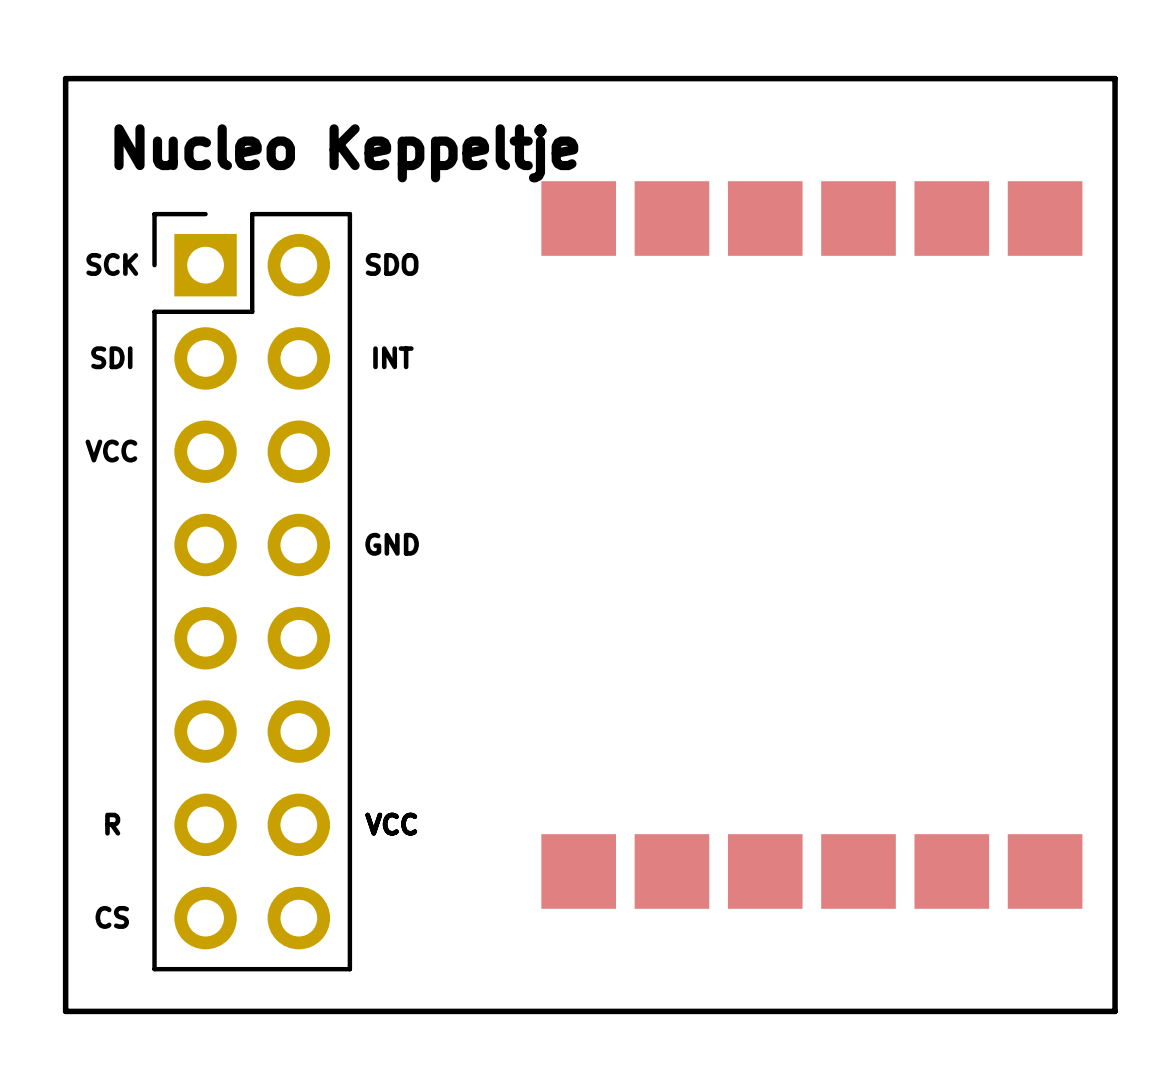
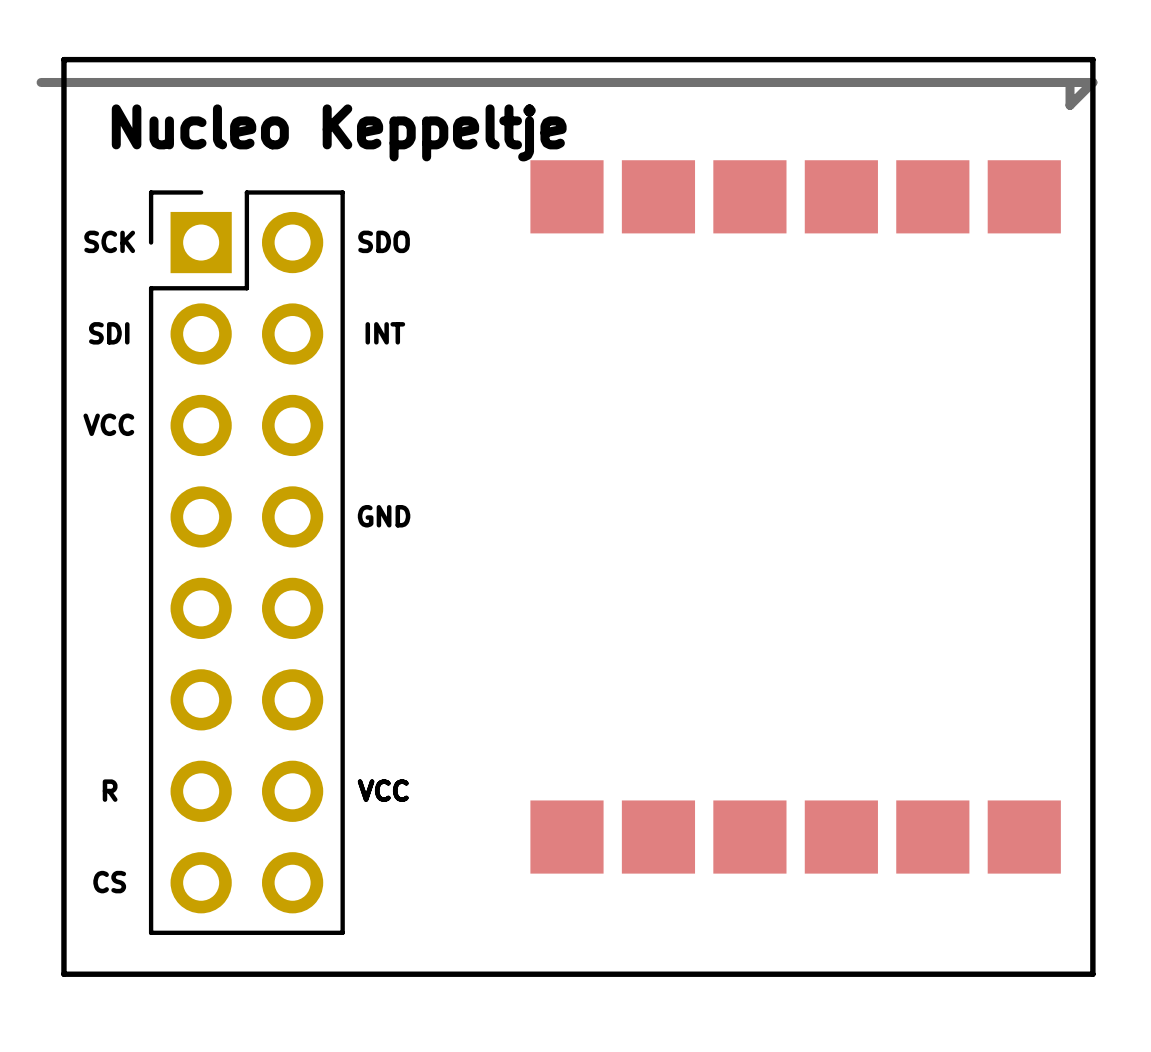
line: none -> (41, 82) (1092, 82) (1070, 105) (1070, 82)

